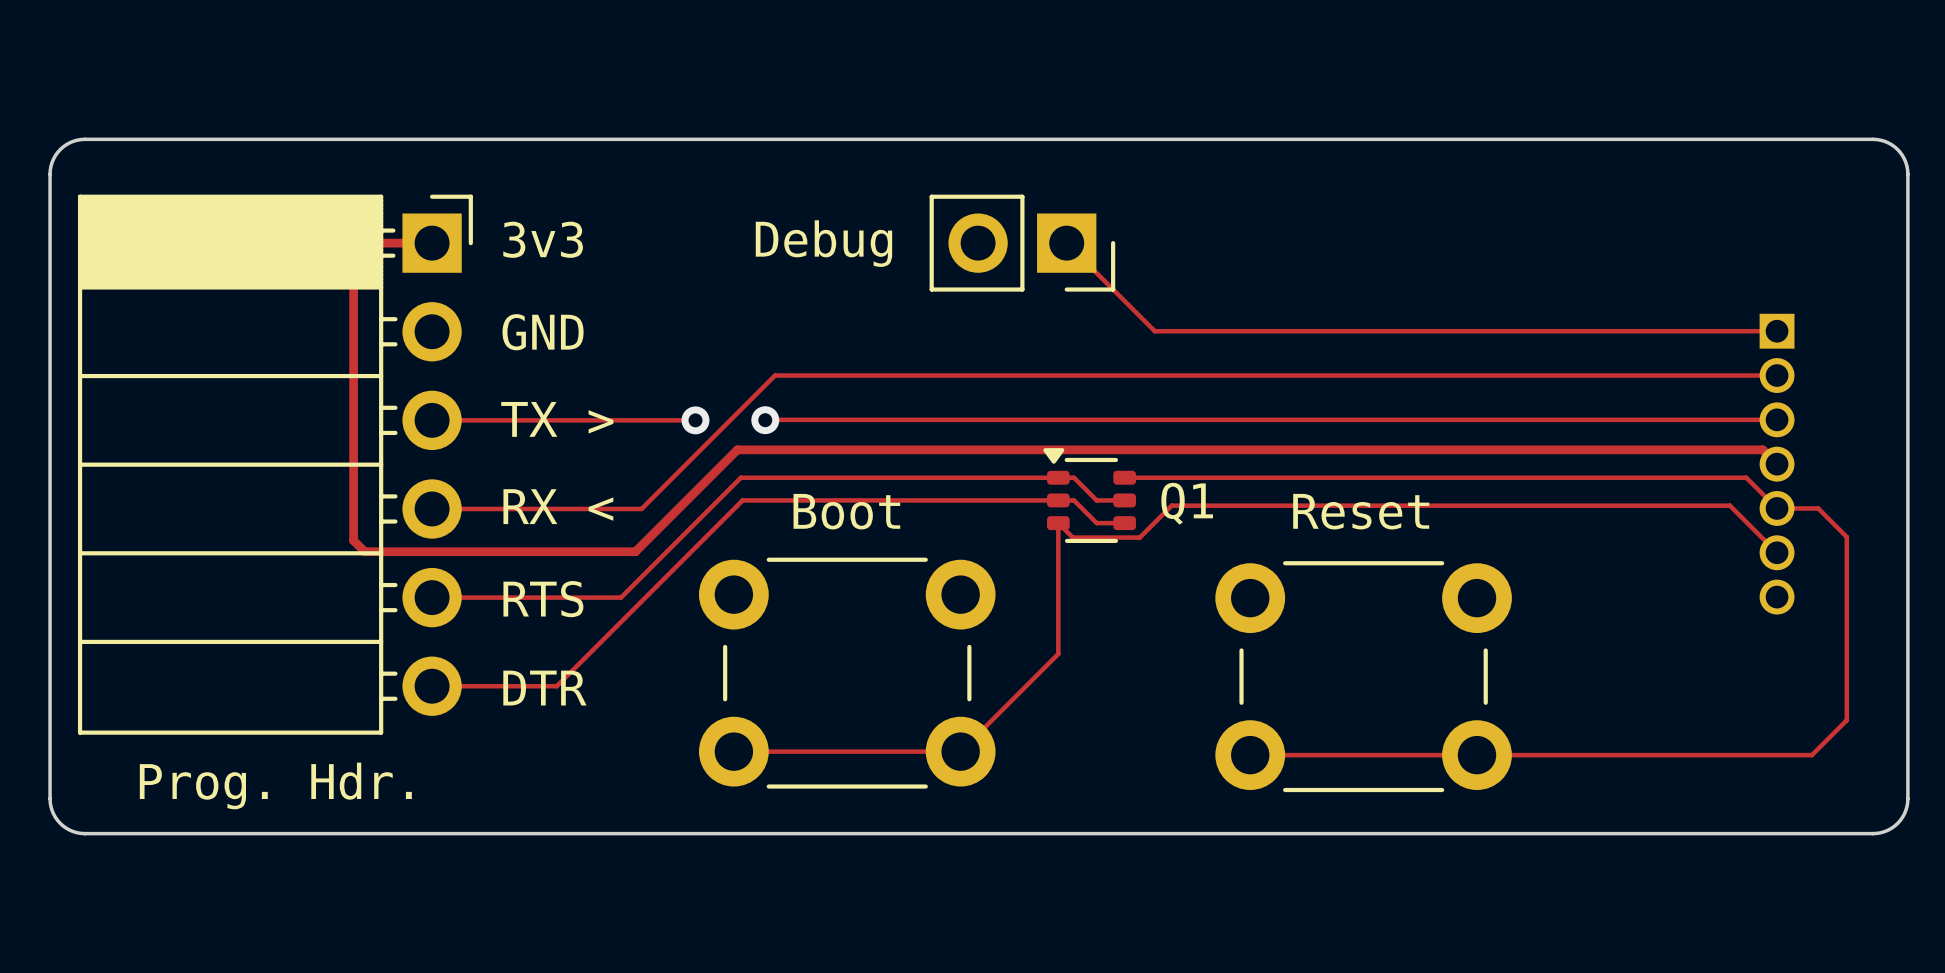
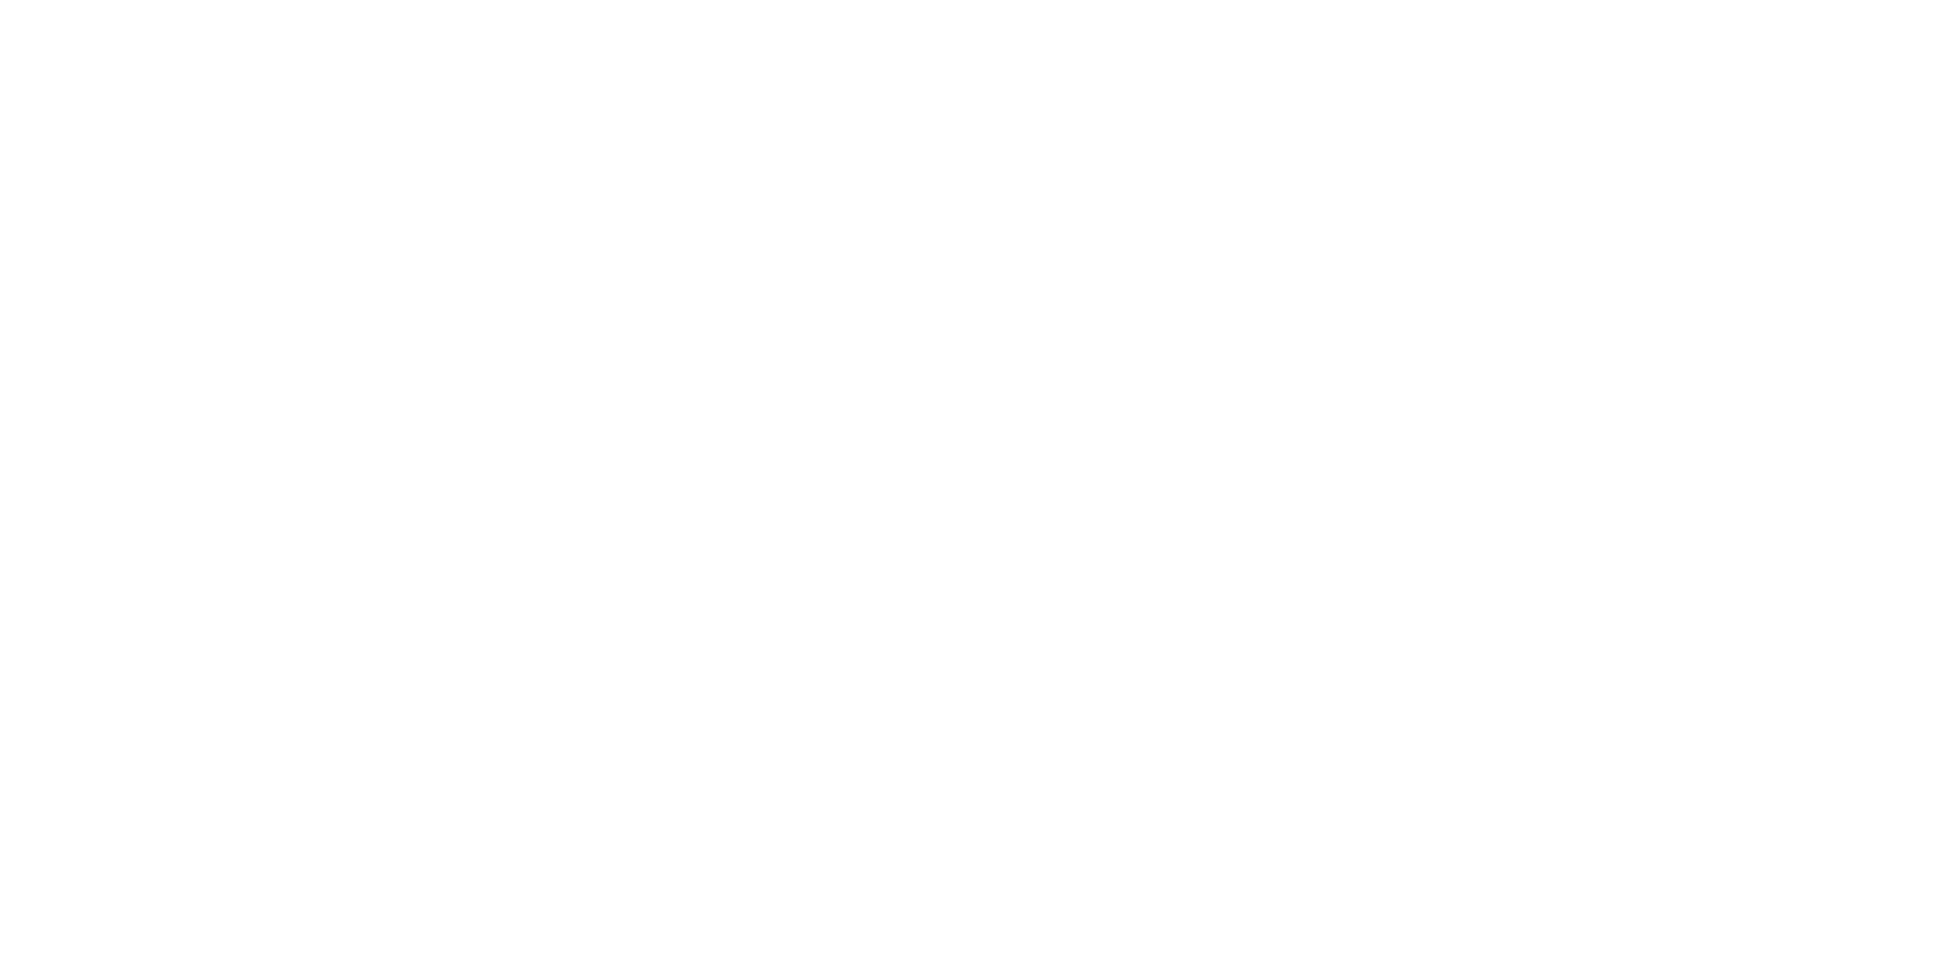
board edge: (84, 139) (1873, 139) (1884, 141) (1900, 152) (1905, 162) (1907, 174) (1907, 798) (1905, 810) (1900, 820) (1891, 828) (1873, 833) (84, 833) (73, 831) (63, 826) (55, 817) (50, 798) (50, 174) (52, 162) (60, 149) (73, 141) (84, 139) -> none
text: 3v3 (543, 239) -> none
track: (432, 243) (375, 243) (353, 264) (353, 540) (364, 551) (635, 551) (737, 449) (1762, 449) (1777, 464) -> none
part: Debug (1022, 243) -> none
track: (1066, 243) (1154, 331) (1777, 331) -> none
text: GND (543, 332) -> none
track: (1777, 375) (775, 375) (641, 508) (432, 508) -> none
text: TX > (557, 419) -> none
track: (765, 419) (1777, 419) -> none
track: (432, 420) (695, 420) -> none
via: (695, 420) -> none
via: (765, 420) -> none
part: Prog. Hdr. (275, 464) -> none
part: (1777, 464) -> none
track: (1124, 477) (1746, 477) (1777, 508) (1818, 508) (1846, 537) (1846, 720) (1811, 755) (1250, 755) -> none
Q1: (1089, 495) -> none
track: (1124, 500) (1096, 500) (1074, 477) (740, 477) (621, 597) (432, 597) -> none
text: RX < (558, 506) -> none
track: (1124, 523) (1096, 523) (1074, 500) (742, 500) (556, 686) (432, 686) -> none
track: (1777, 552) (1729, 505) (1171, 505) (1139, 537) (1072, 537) (1058, 523) (1058, 653) (960, 751) (733, 751) -> none
text: RTS (543, 599) -> none
part: Boot (847, 673) -> none
part: Reset (1363, 676) -> none
text: DTR (544, 688) -> none

